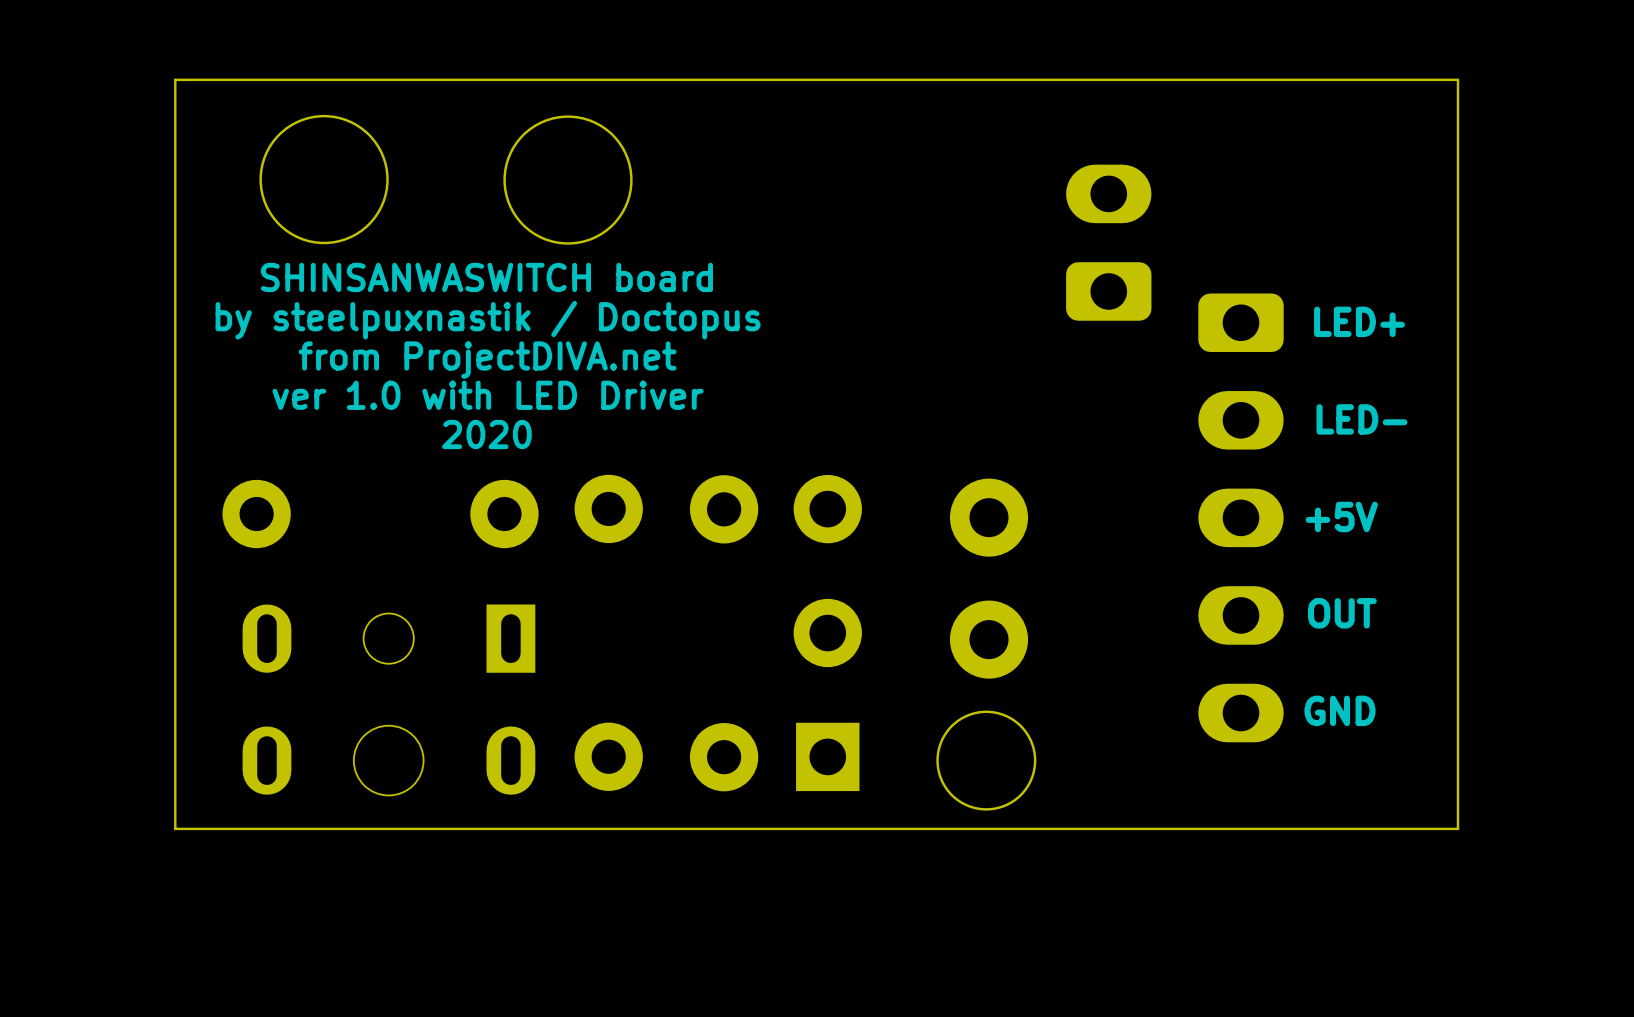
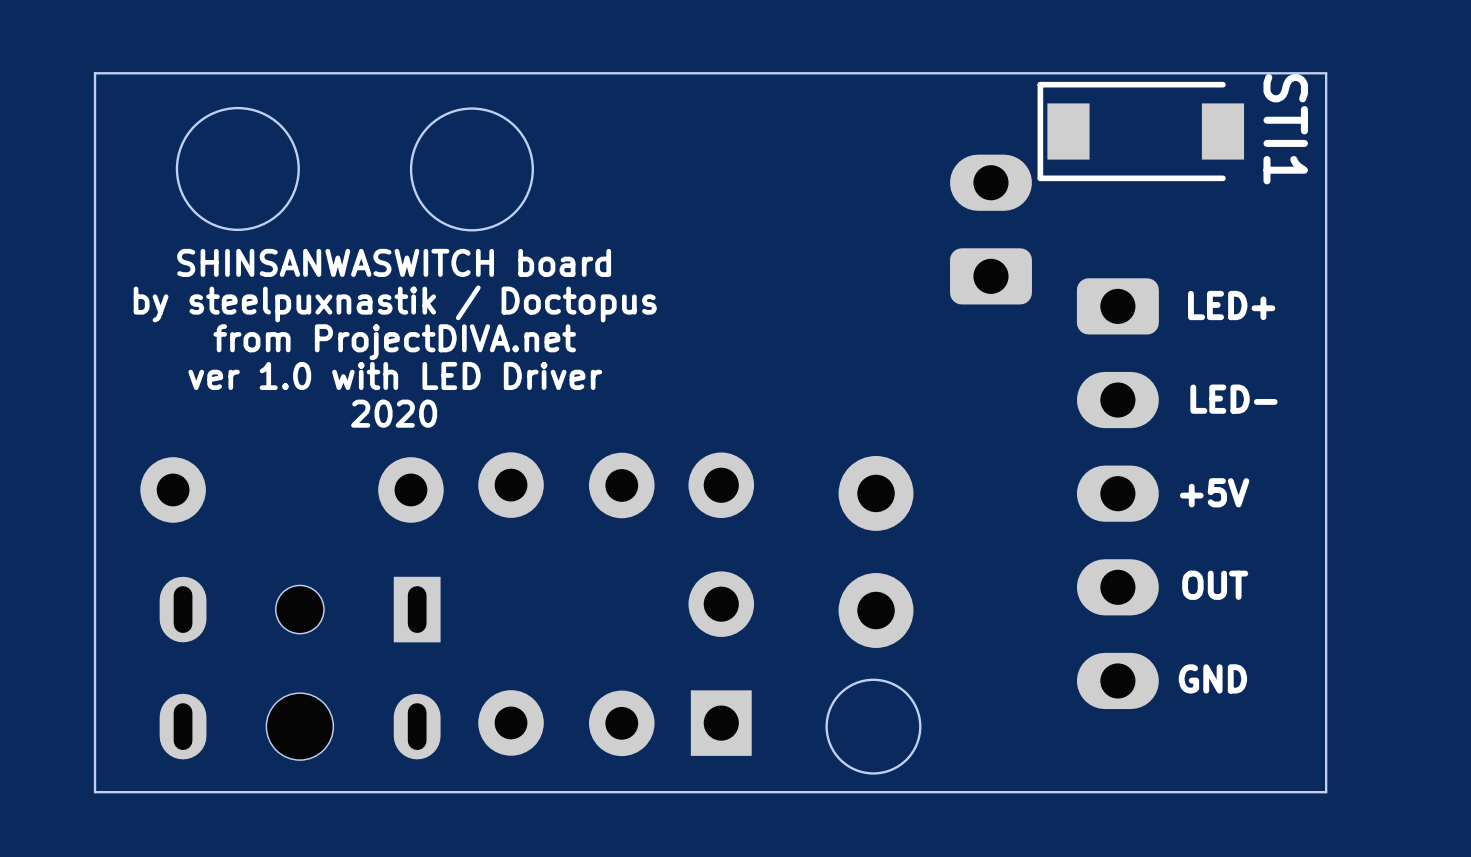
STI1: none -> (1140, 131)

